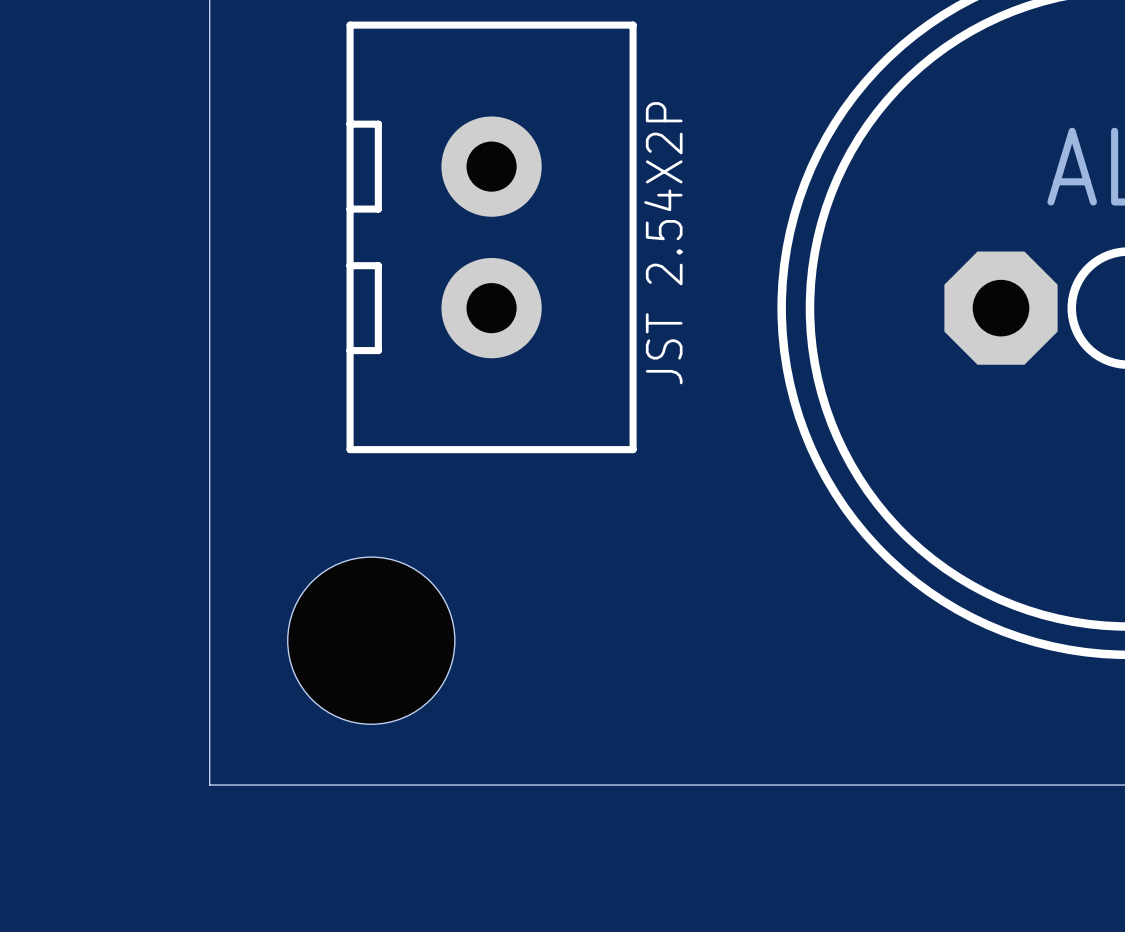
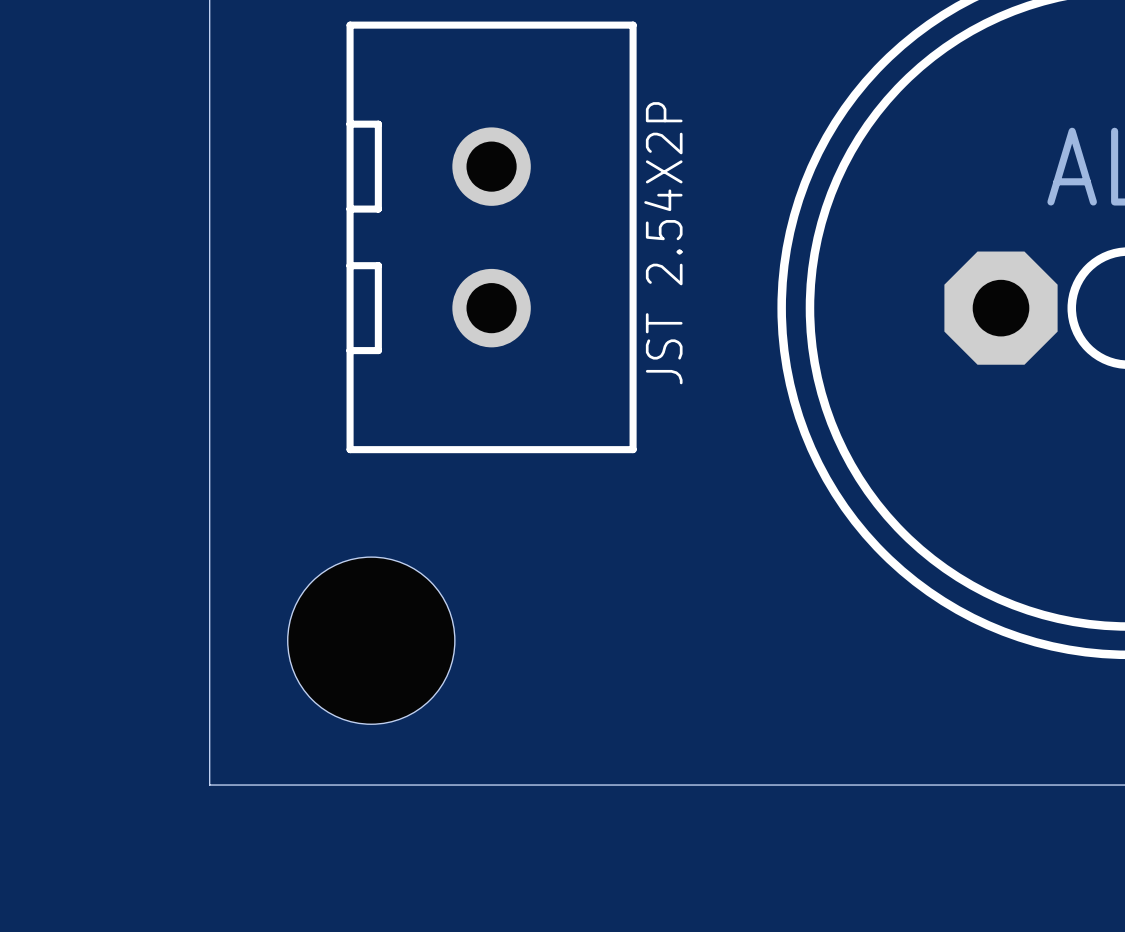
part footprint: [346, 21, 637, 454] -> [346, 21, 637, 454]

